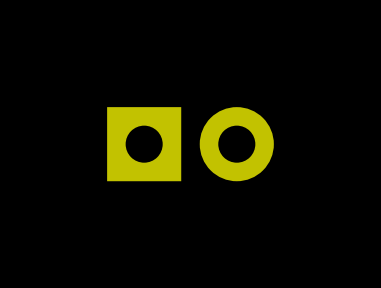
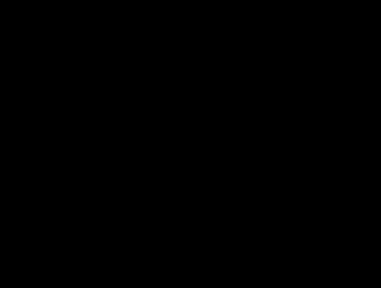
part: (190, 144) -> none

